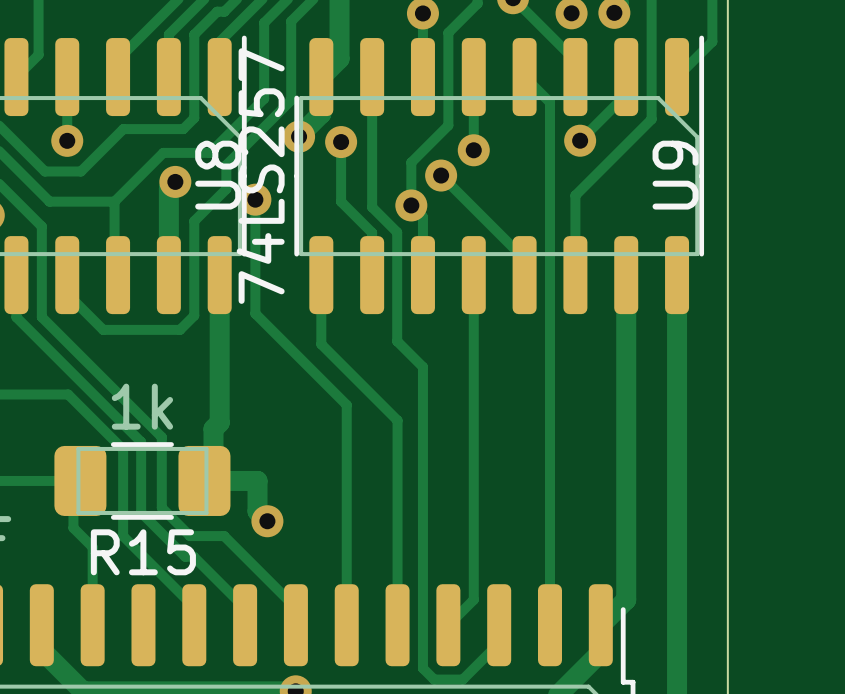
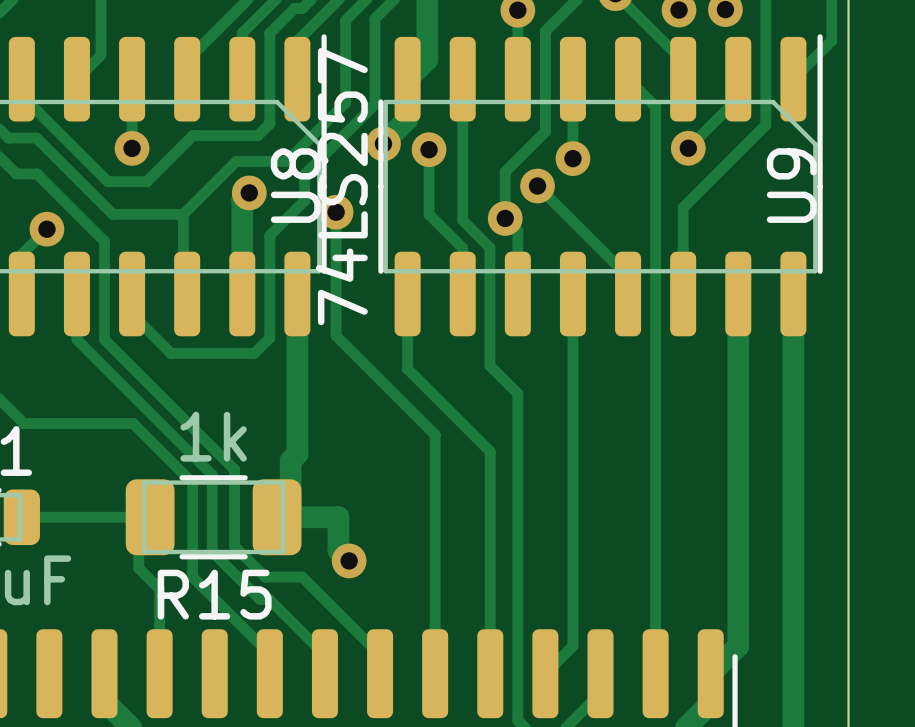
R15 footprint: [54, 442, 231, 520] -> [125, 475, 302, 560]

